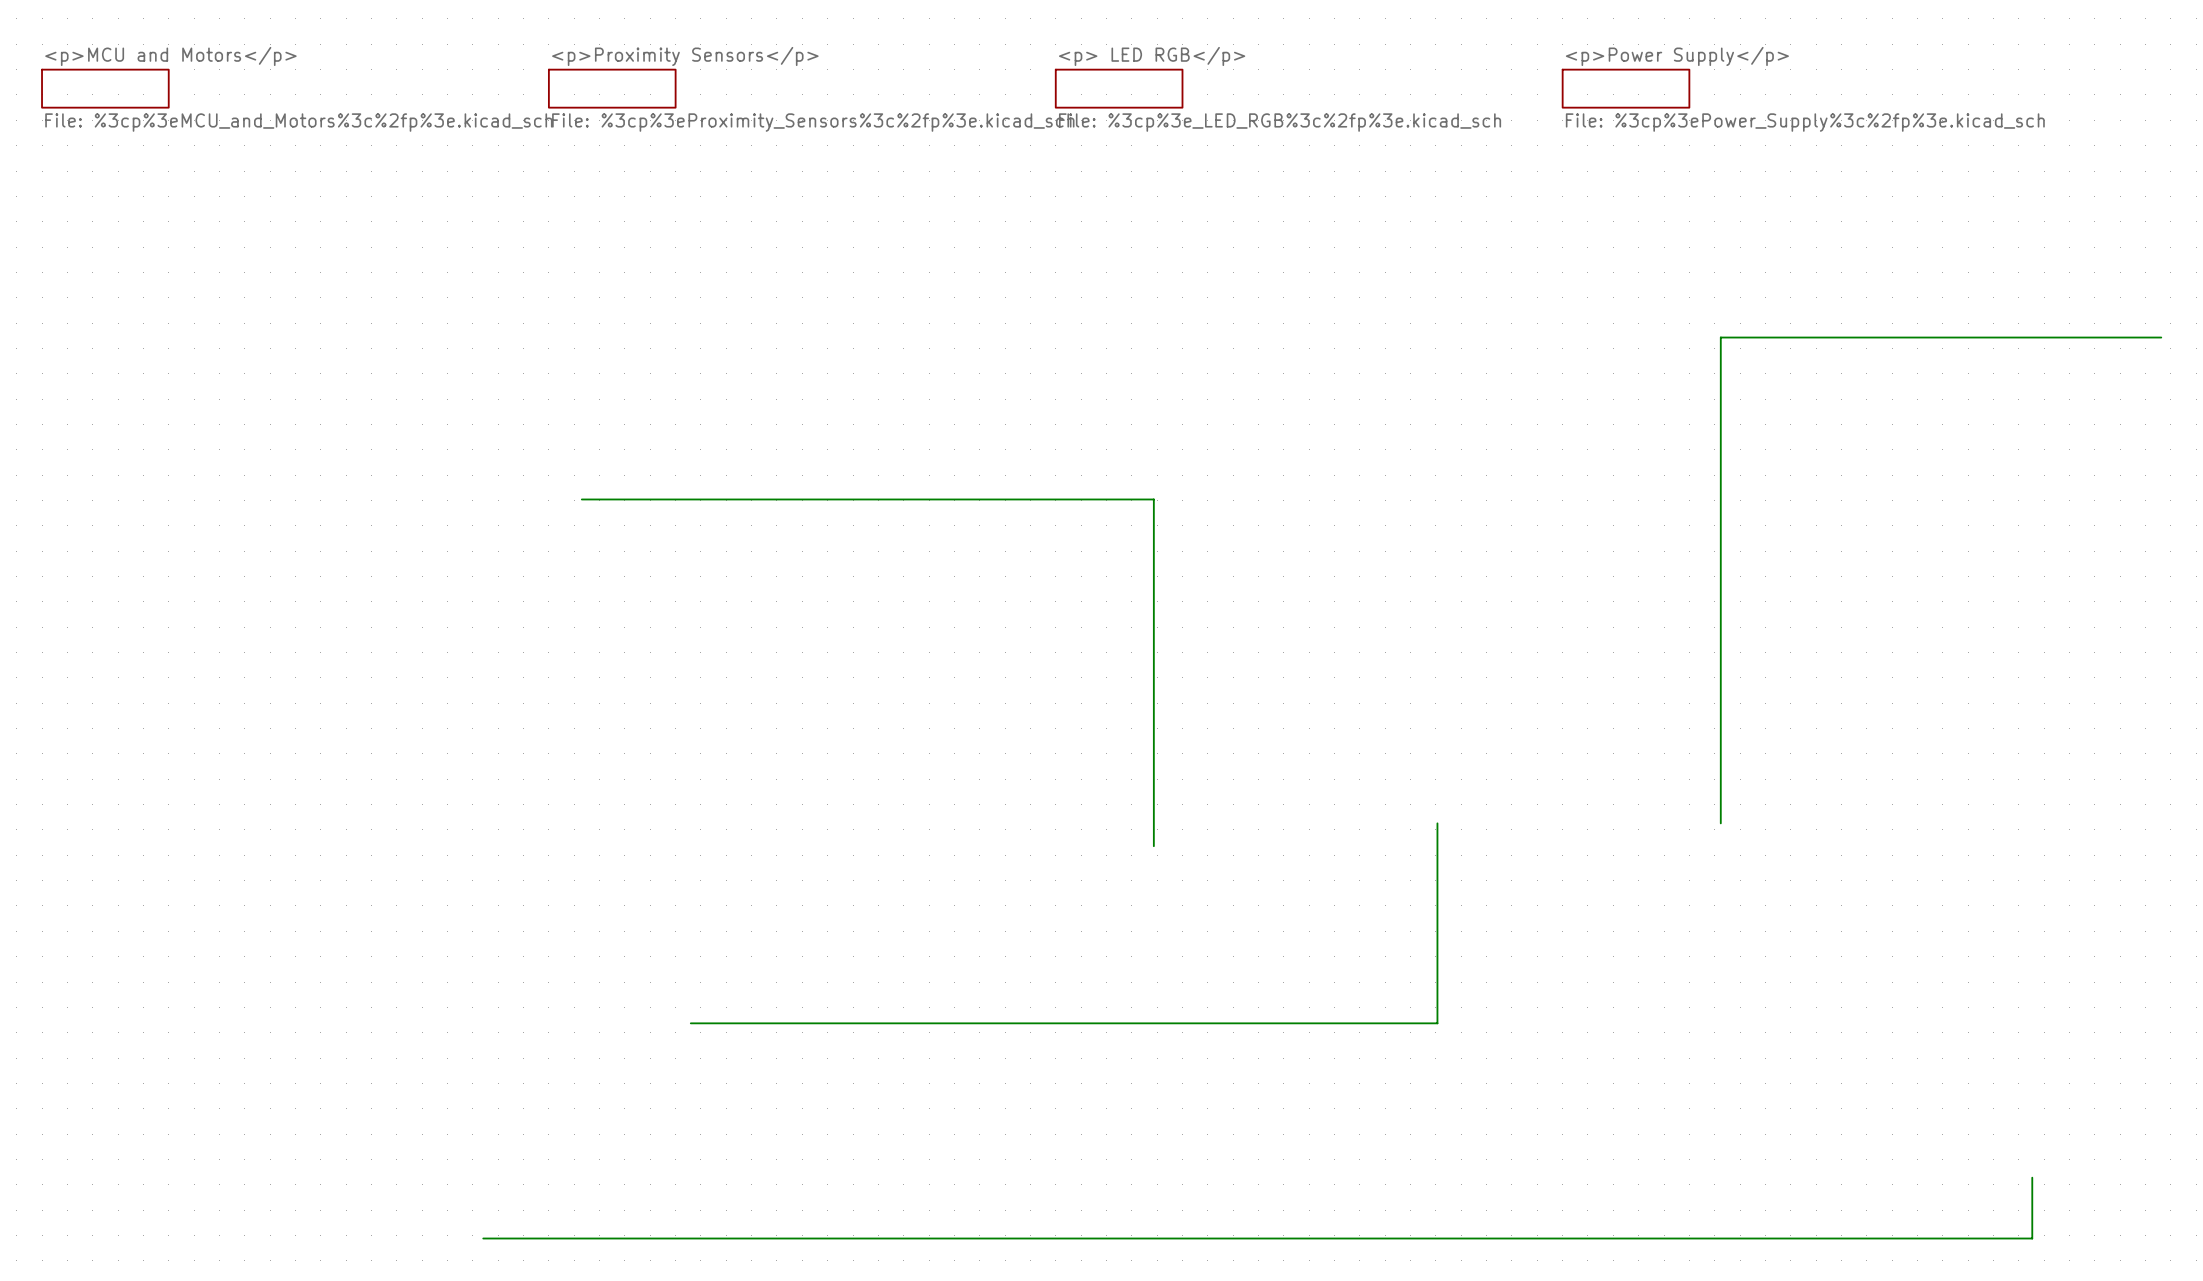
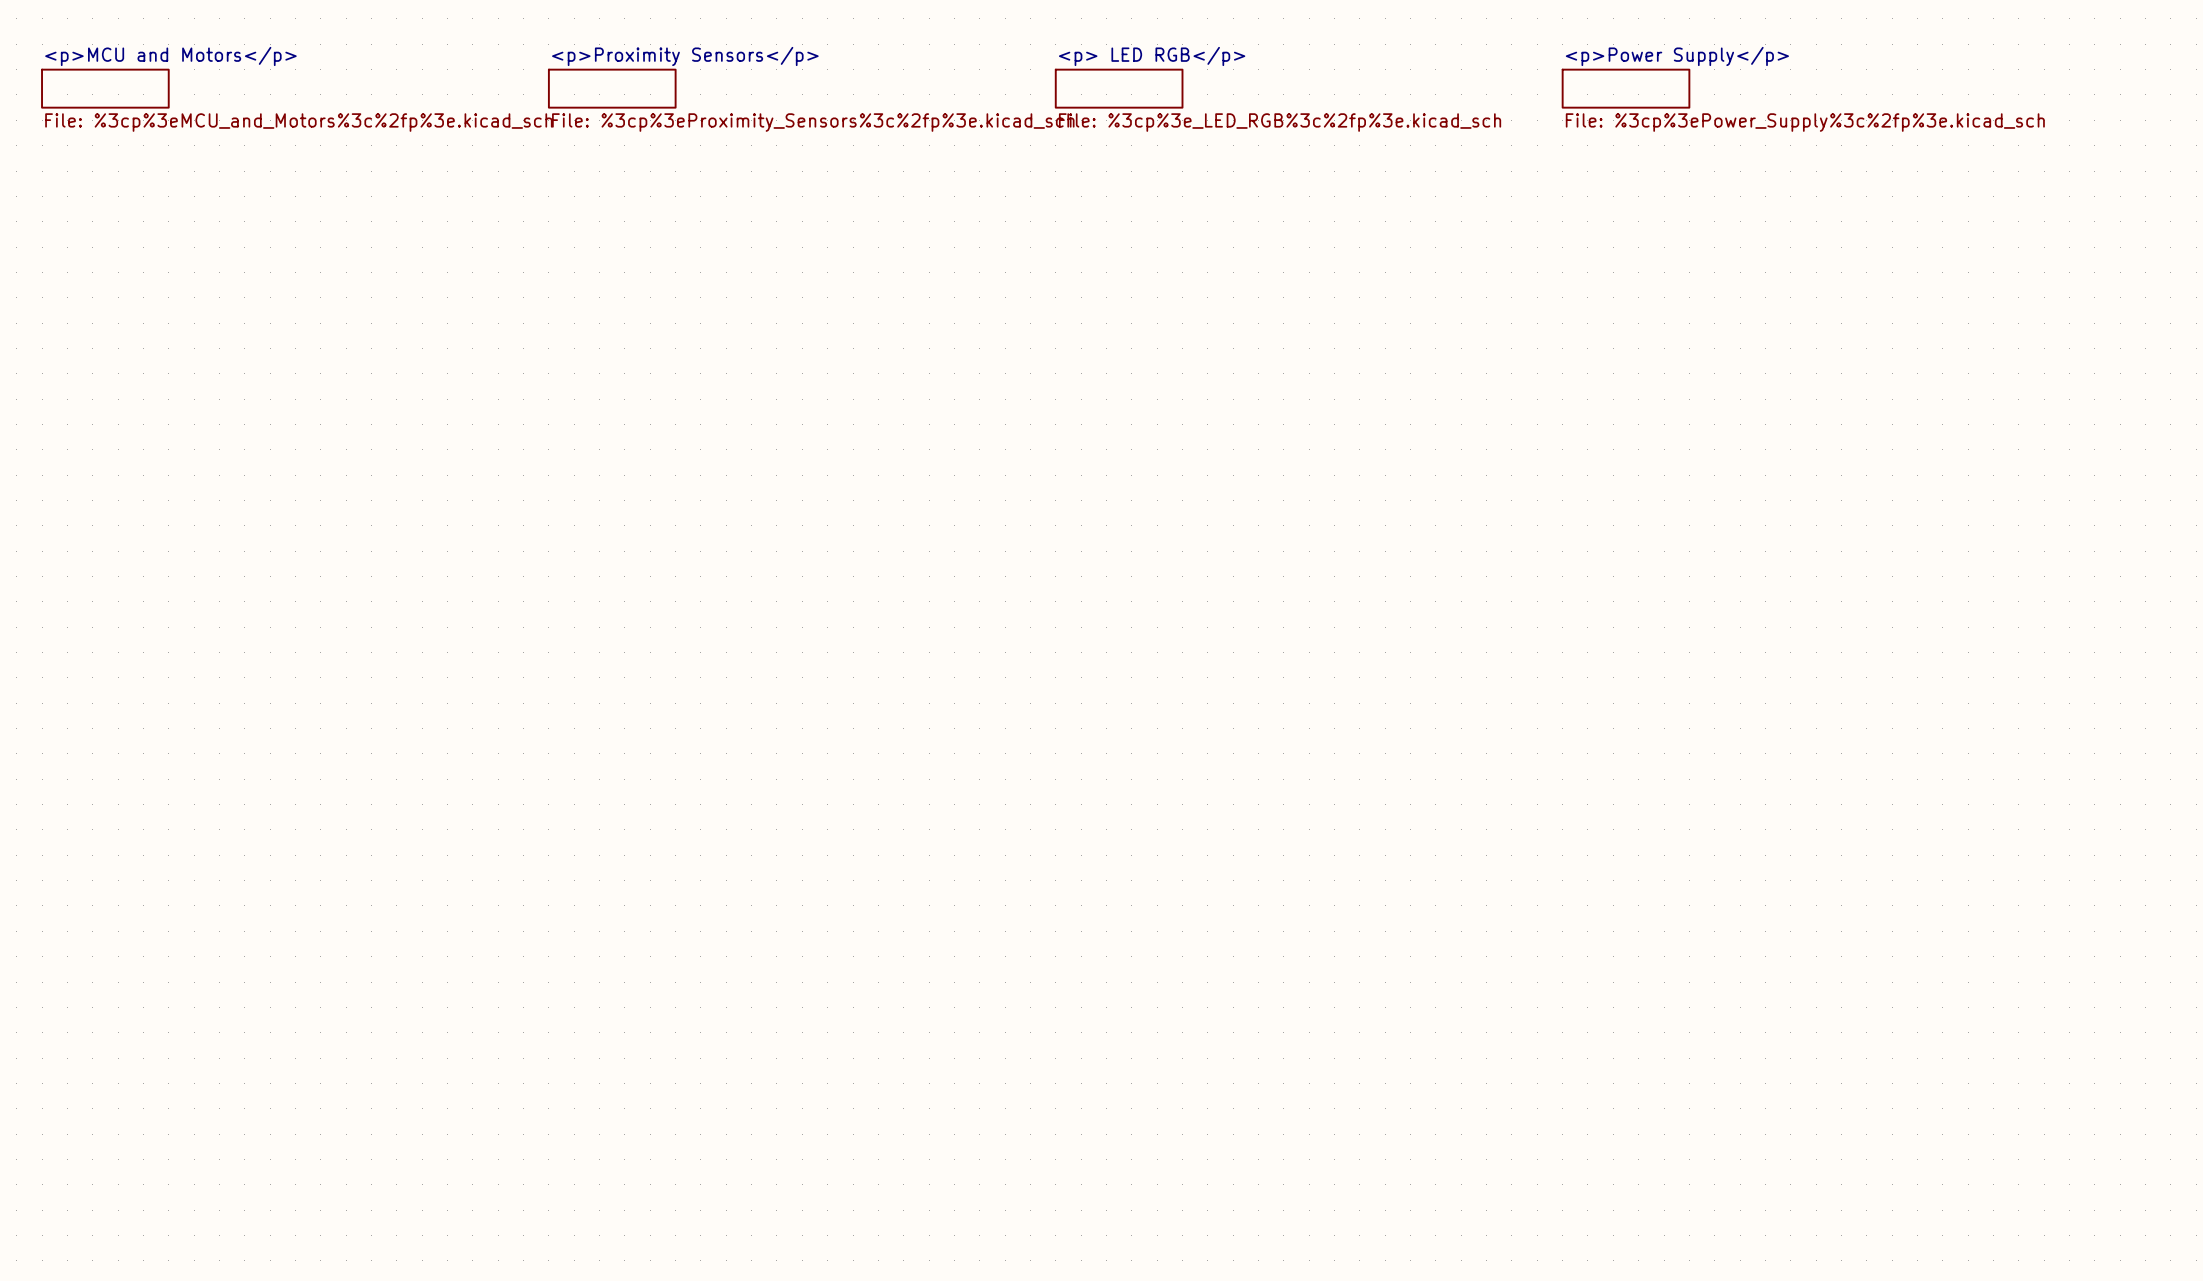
wire: (2161, 337) (1720, 337) (1720, 823) -> none
wire: (581, 499) (1153, 499) (1153, 846) -> none
wire: (1437, 823) (1437, 1023) (690, 1023) -> none
wire: (2032, 1177) (2032, 1238) (483, 1238) -> none

